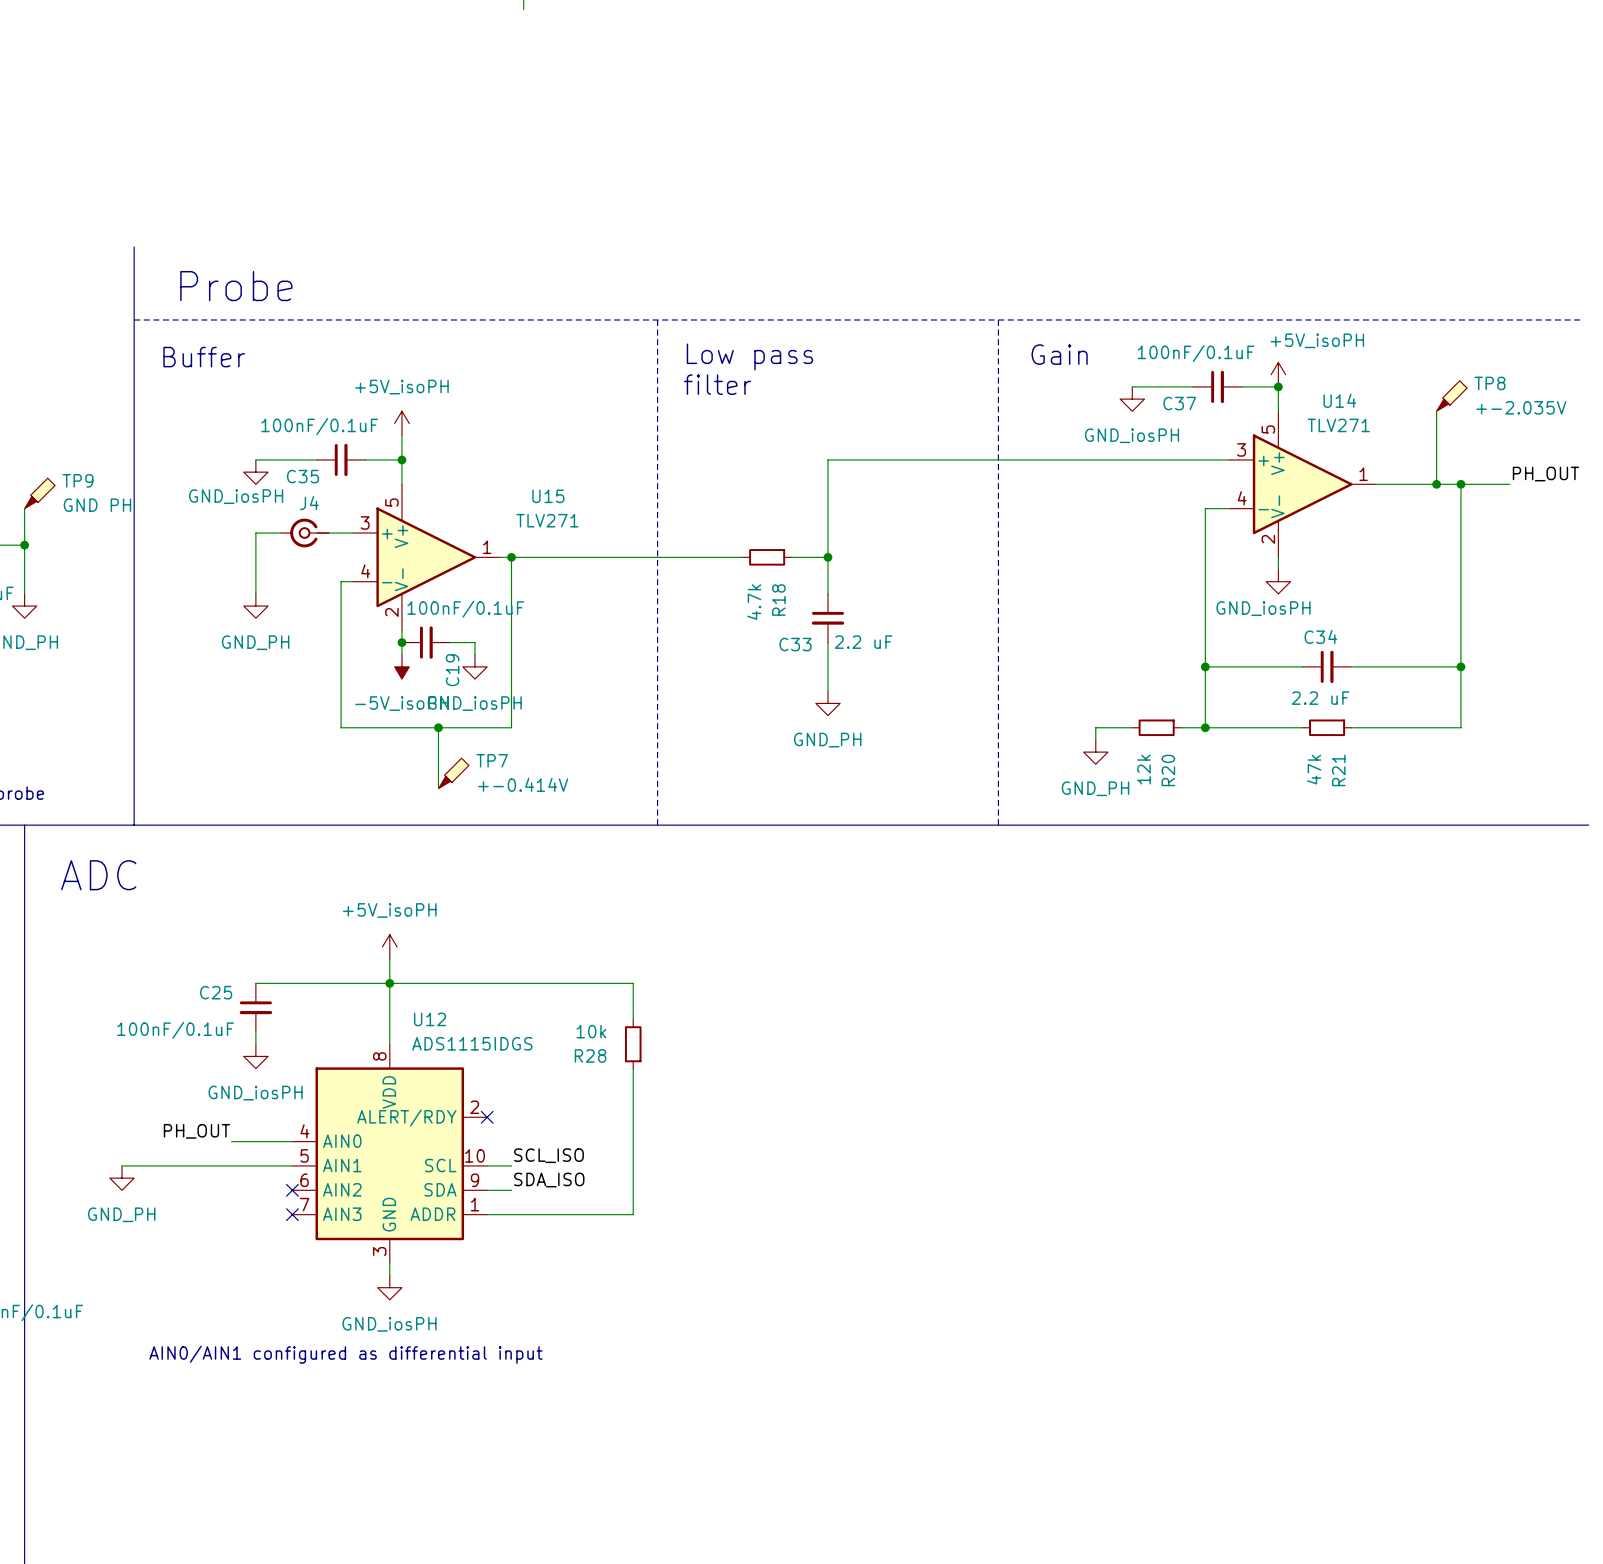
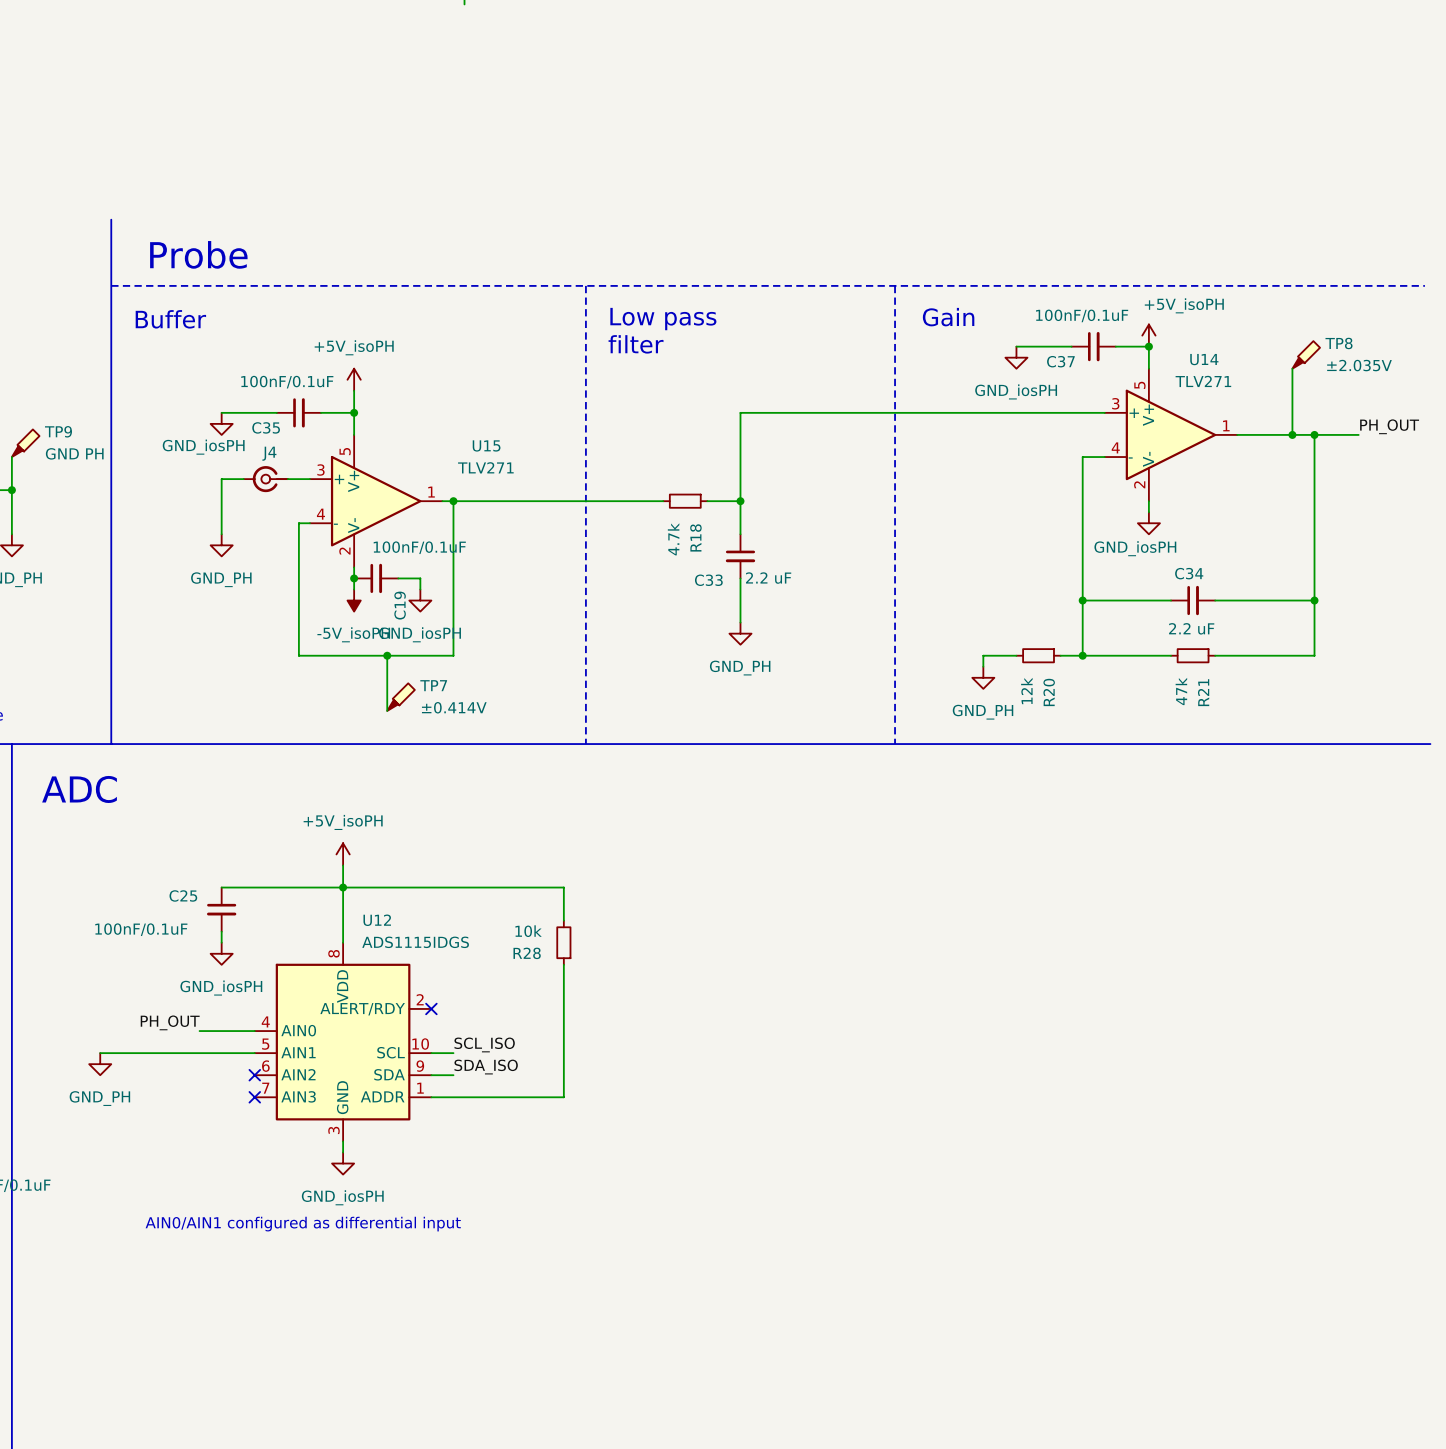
TP8 value: +-2.035V (1521, 407) -> ±2.035V (1359, 365)
TP7 value: +-0.414V (523, 784) -> ±0.414V (454, 707)

